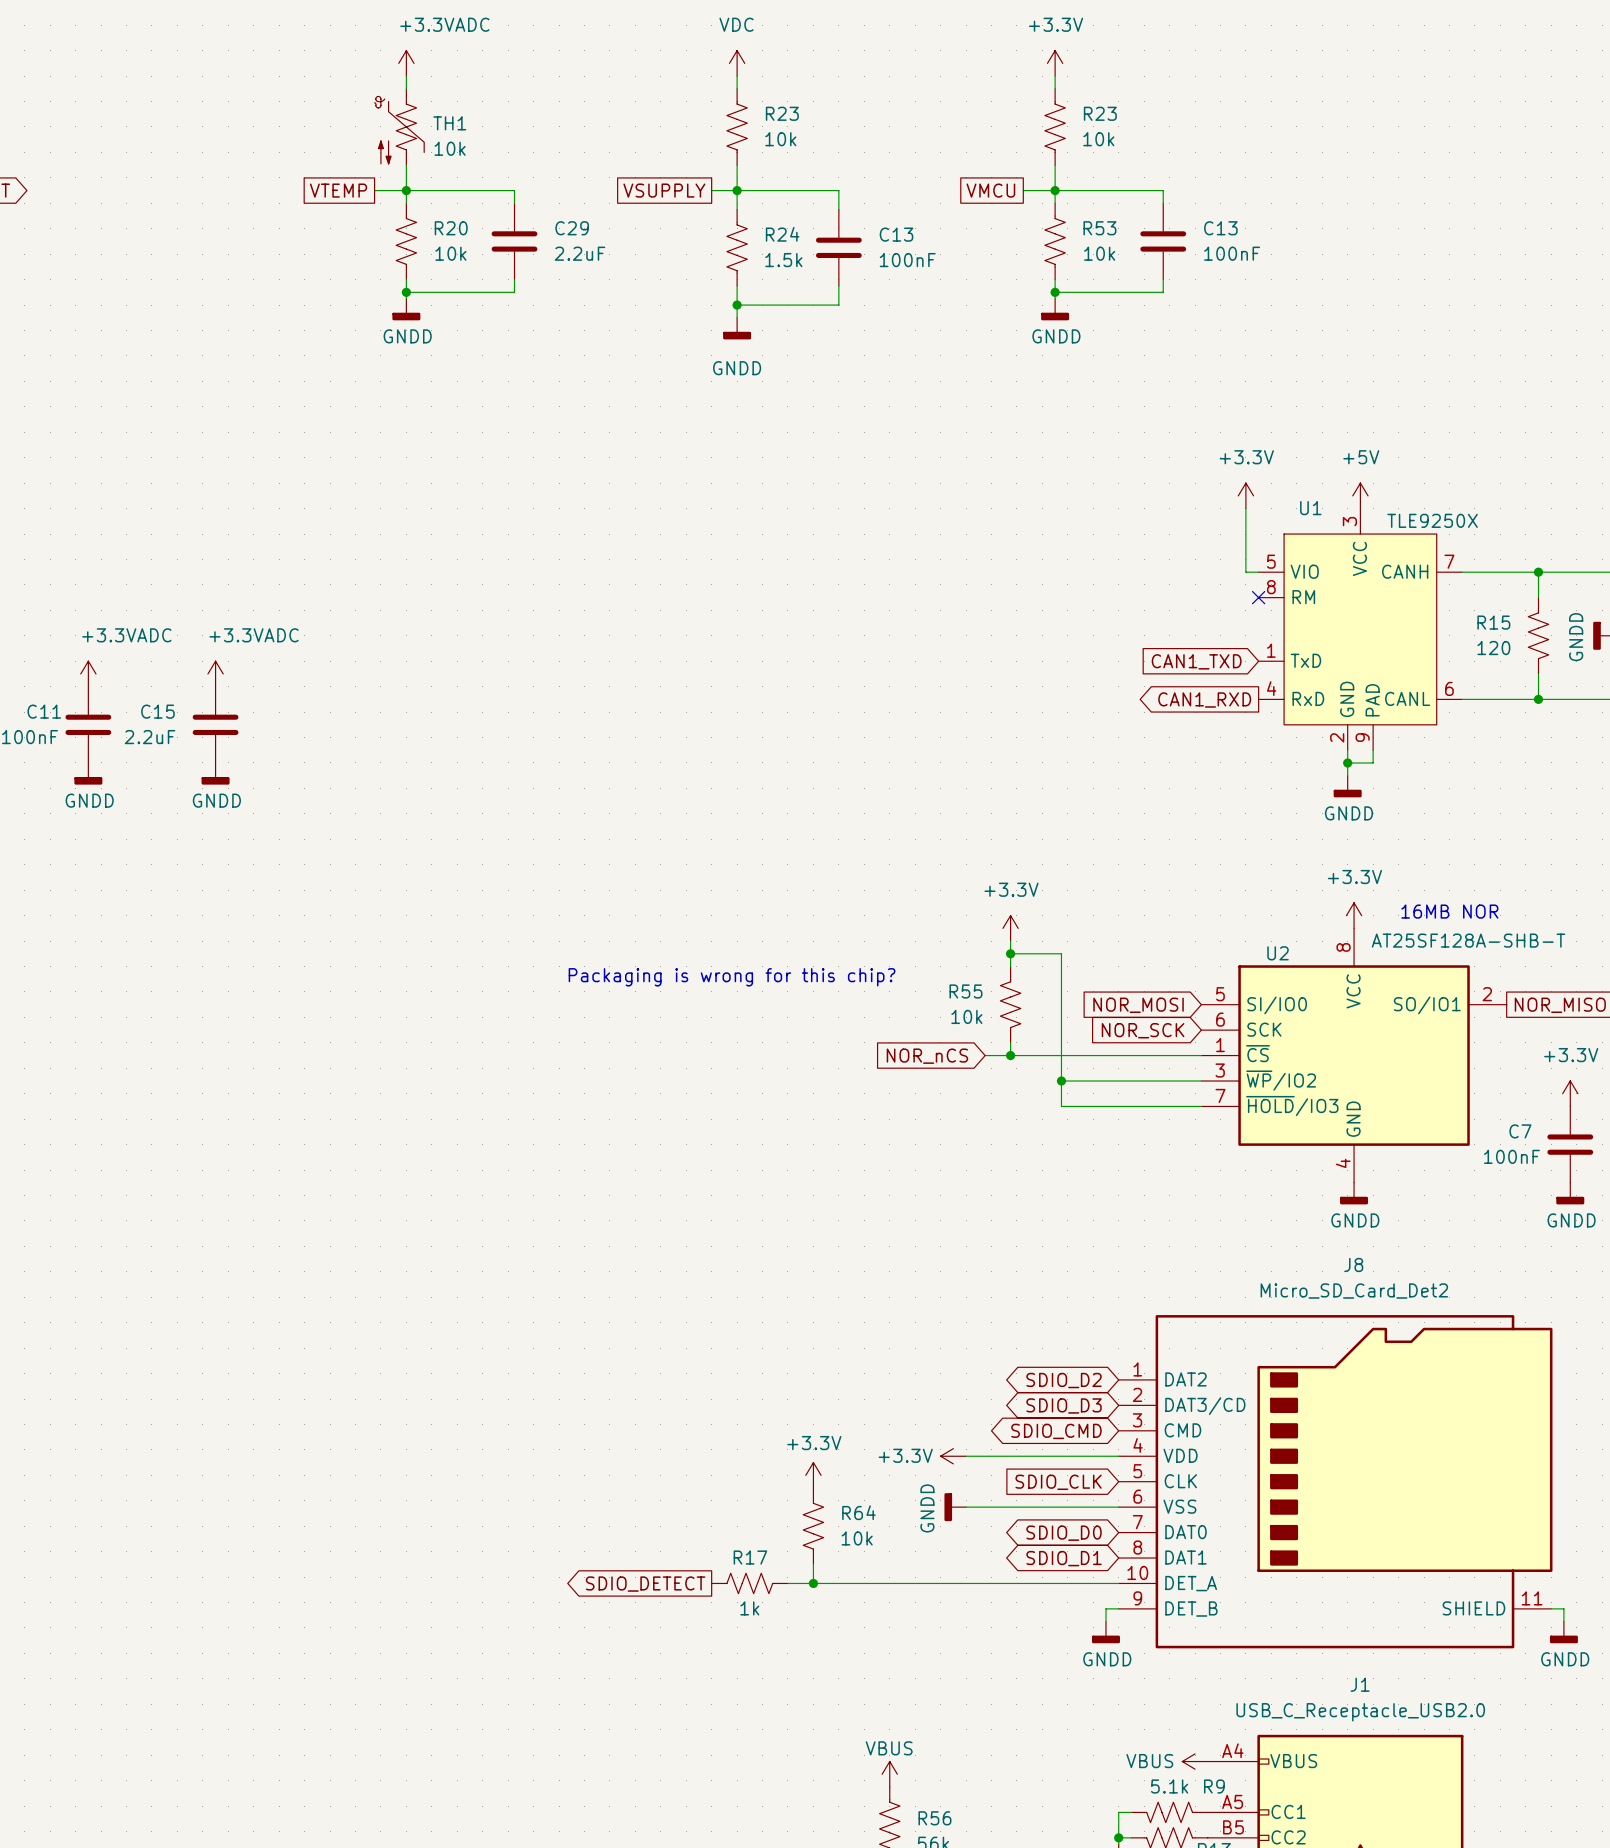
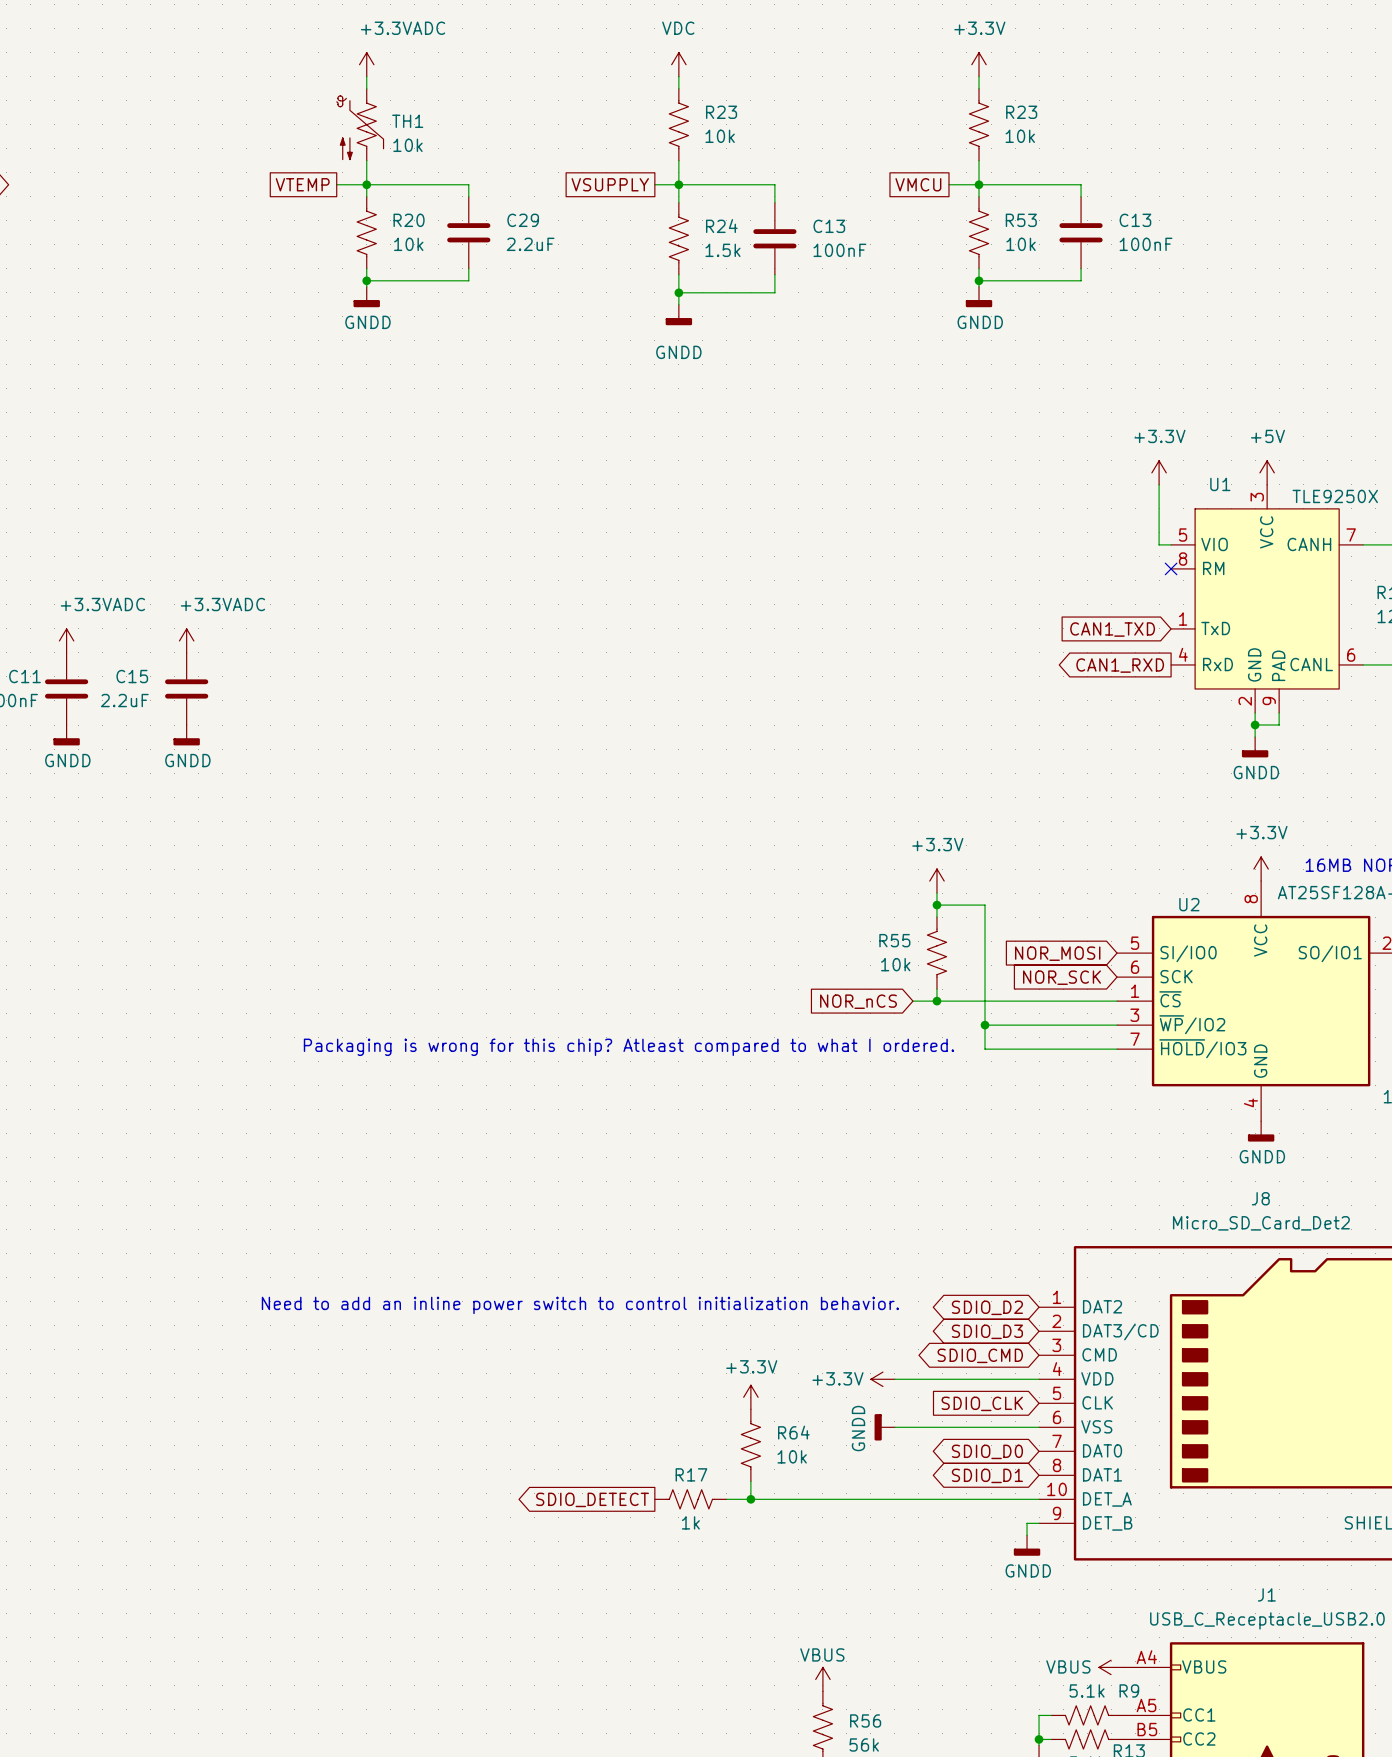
text: Packaging is wrong for this chip? (732, 977) -> none
text: none -> Packaging is wrong for this chip? Atleast compared to what I ordered. (628, 1047)
text: none -> Need to add an inline power switch to control initialization behavior. (580, 1305)

